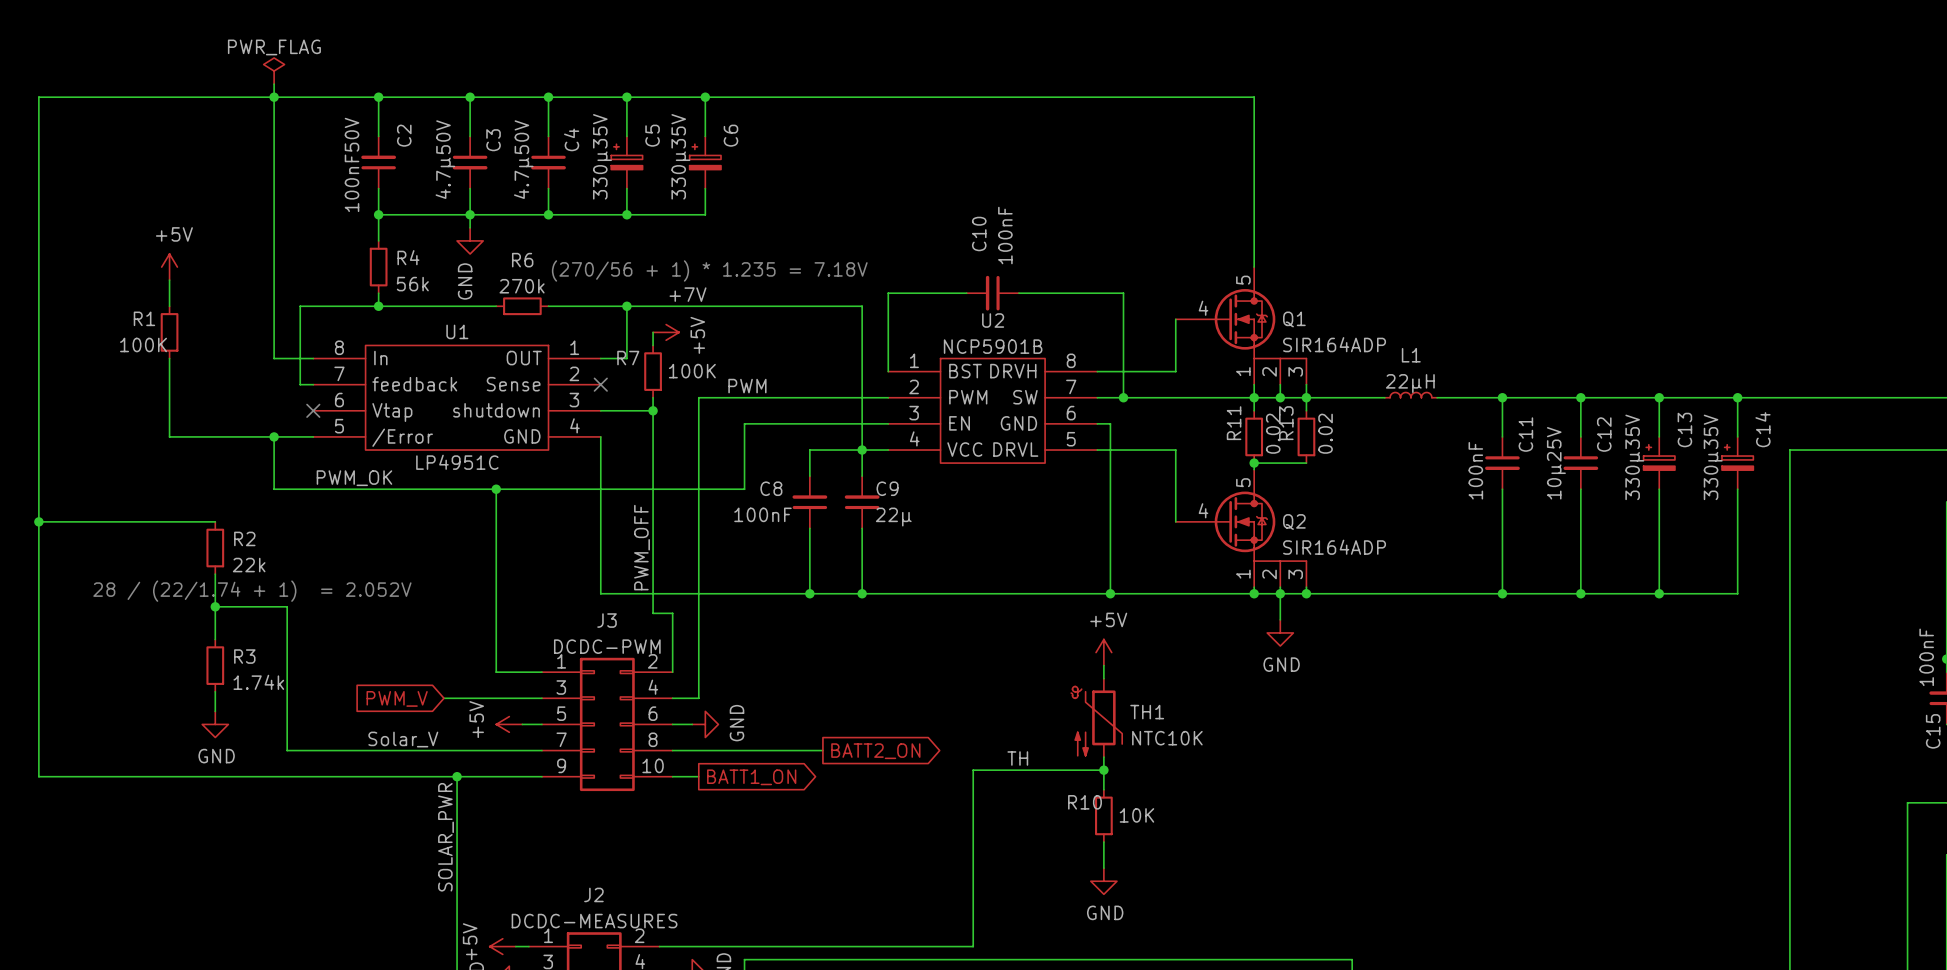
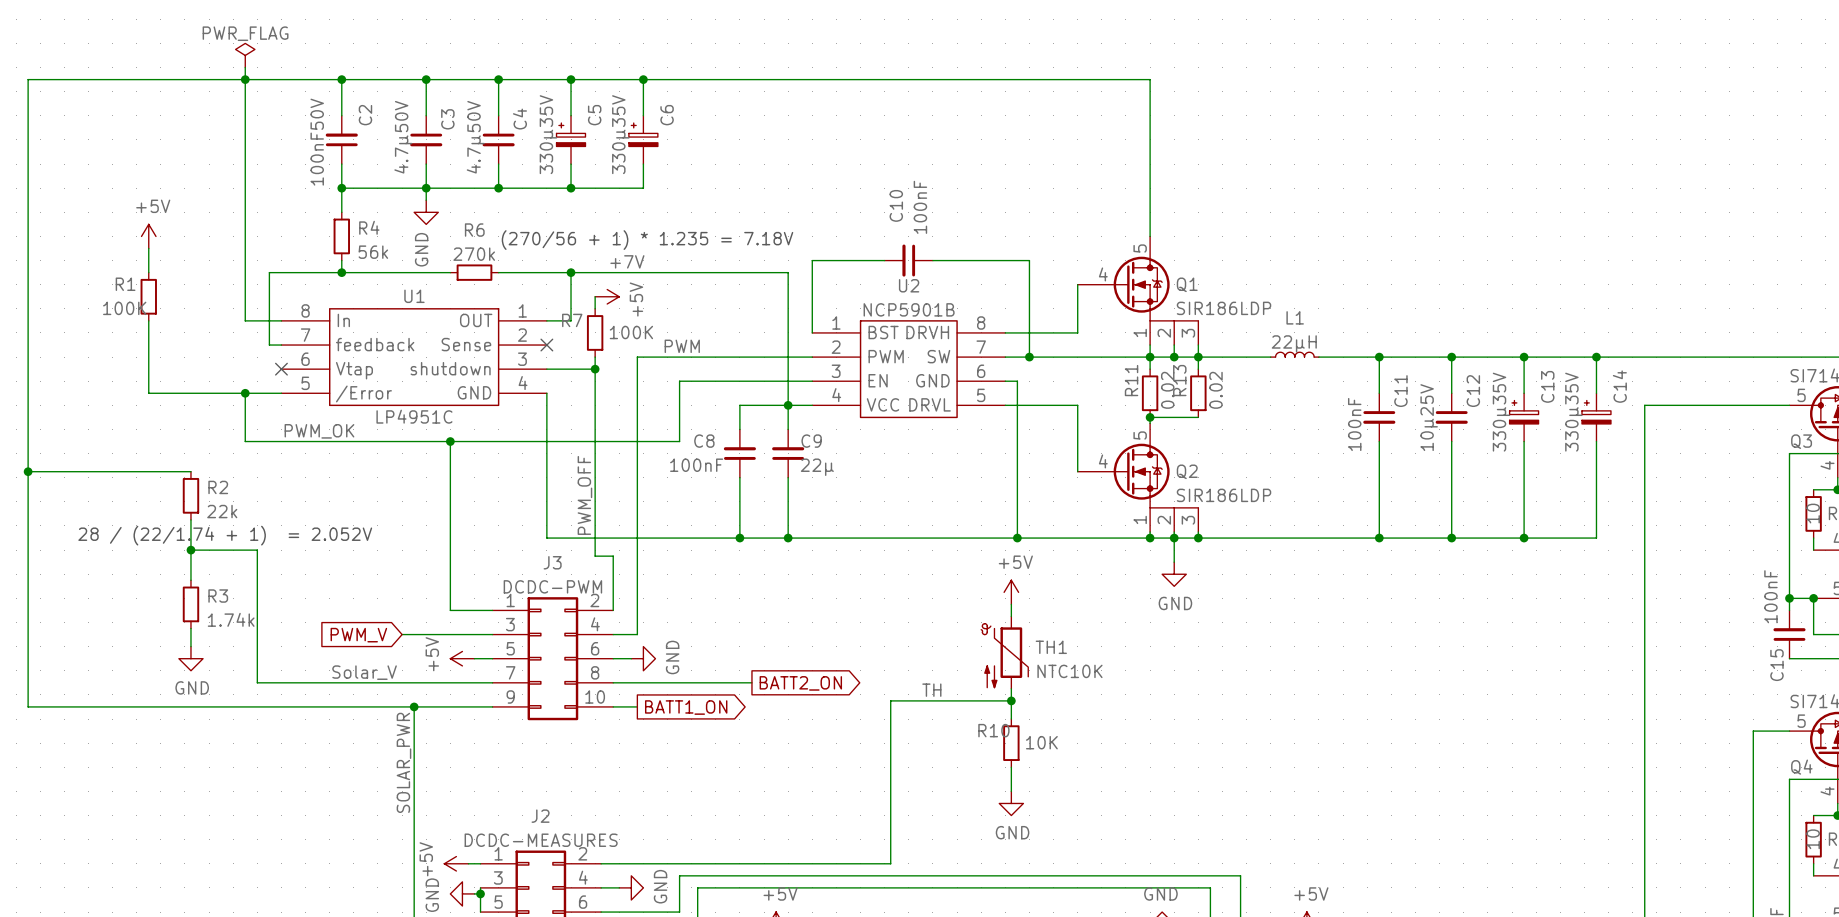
Q1 value: SIR164ADP (1334, 344) -> SIR186LDP (1224, 308)
Q2 value: SIR164ADP (1334, 547) -> SIR186LDP (1224, 495)

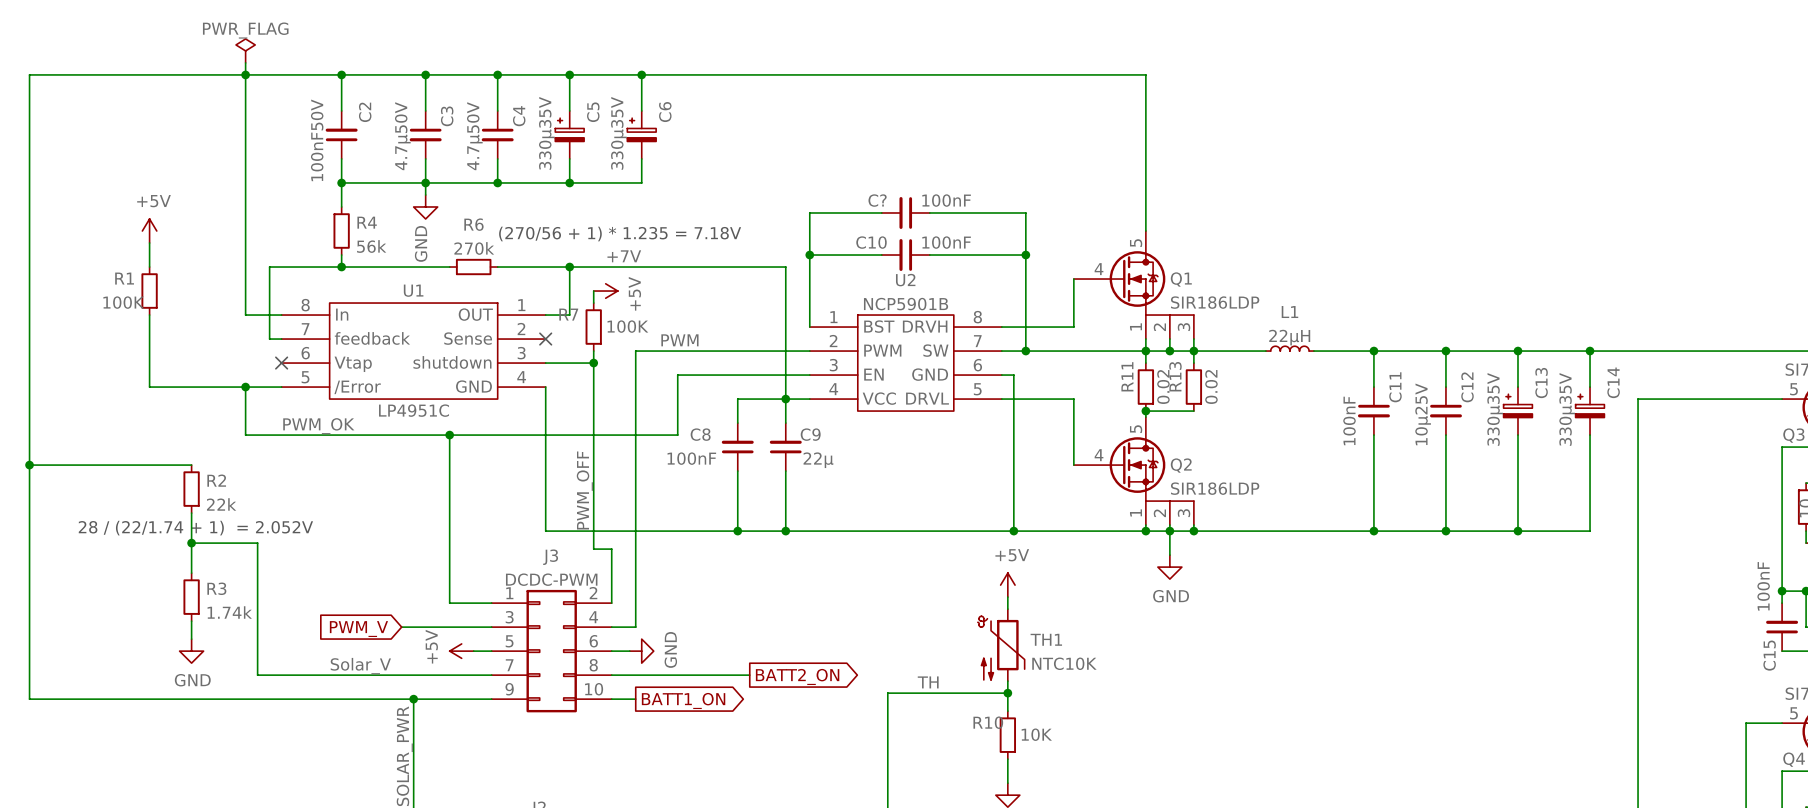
C10 name rotation: 0° (896, 205) -> 90° clockwise (871, 242)
C10 name position: C10 (896, 205) -> C10 (871, 242)
C10 value rotation: 0° (920, 207) -> 90° clockwise (946, 242)
wire: none -> (881, 212) (809, 212) (809, 255)
C?: none -> 100nF (905, 212)
wire: none -> (929, 212) (1025, 212) (1025, 255)
junction: none -> (809, 255)
junction: none -> (1025, 255)

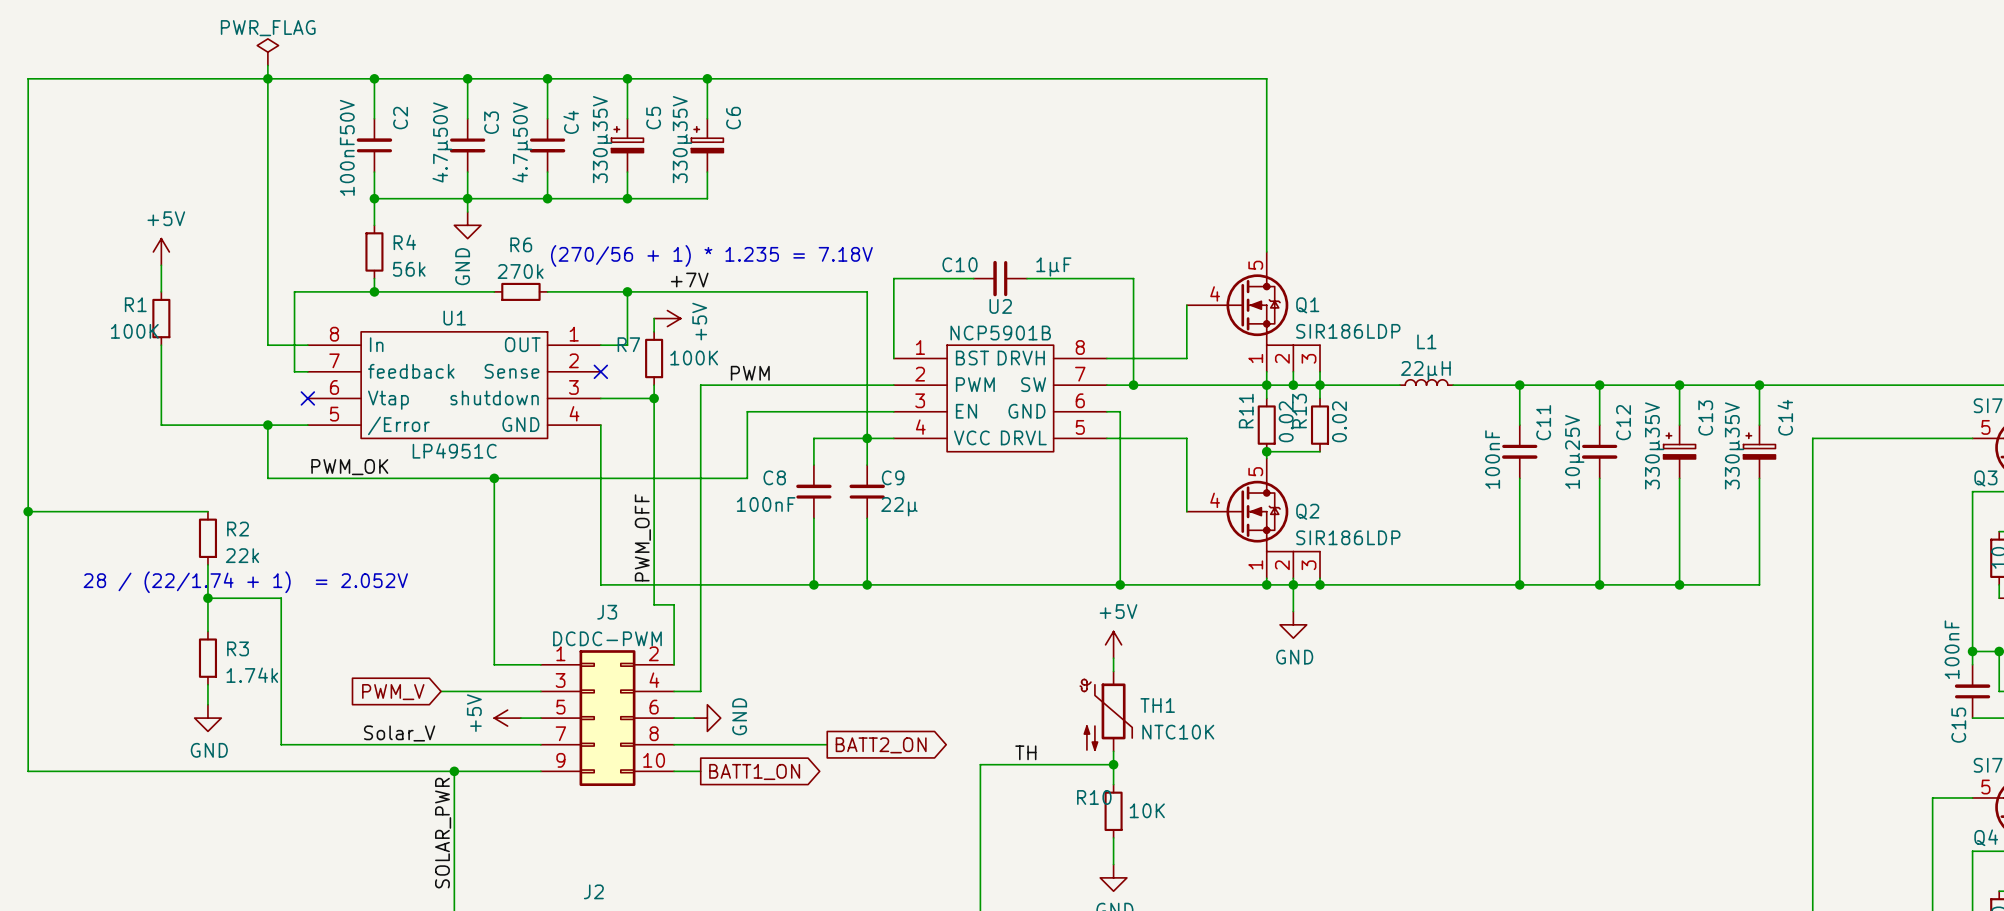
wire: (881, 212) (809, 212) (809, 255) -> none
C?: 100nF (905, 212) -> none
wire: (929, 212) (1025, 212) (1025, 255) -> none
C10 value: 100nF (946, 242) -> 1µF (1053, 267)
junction: (809, 255) -> none
junction: (1025, 255) -> none

